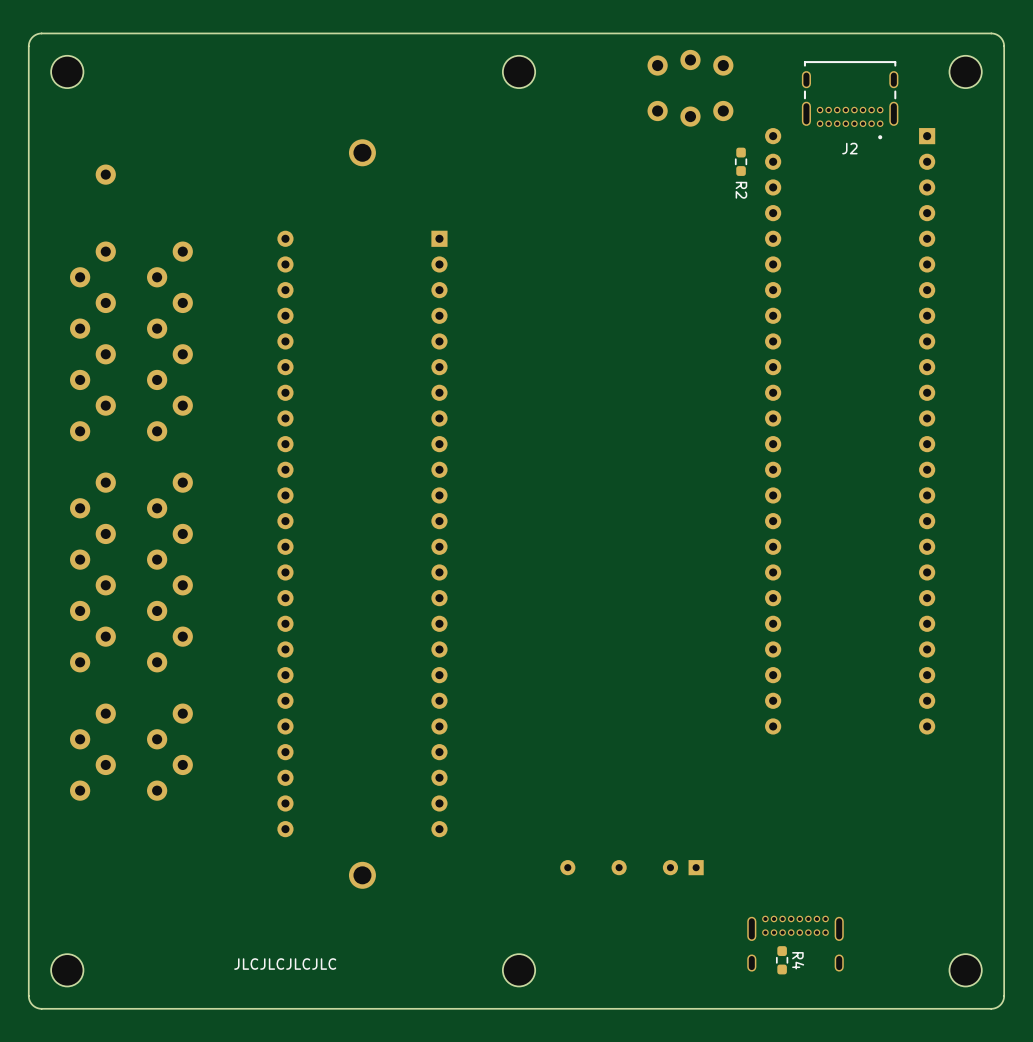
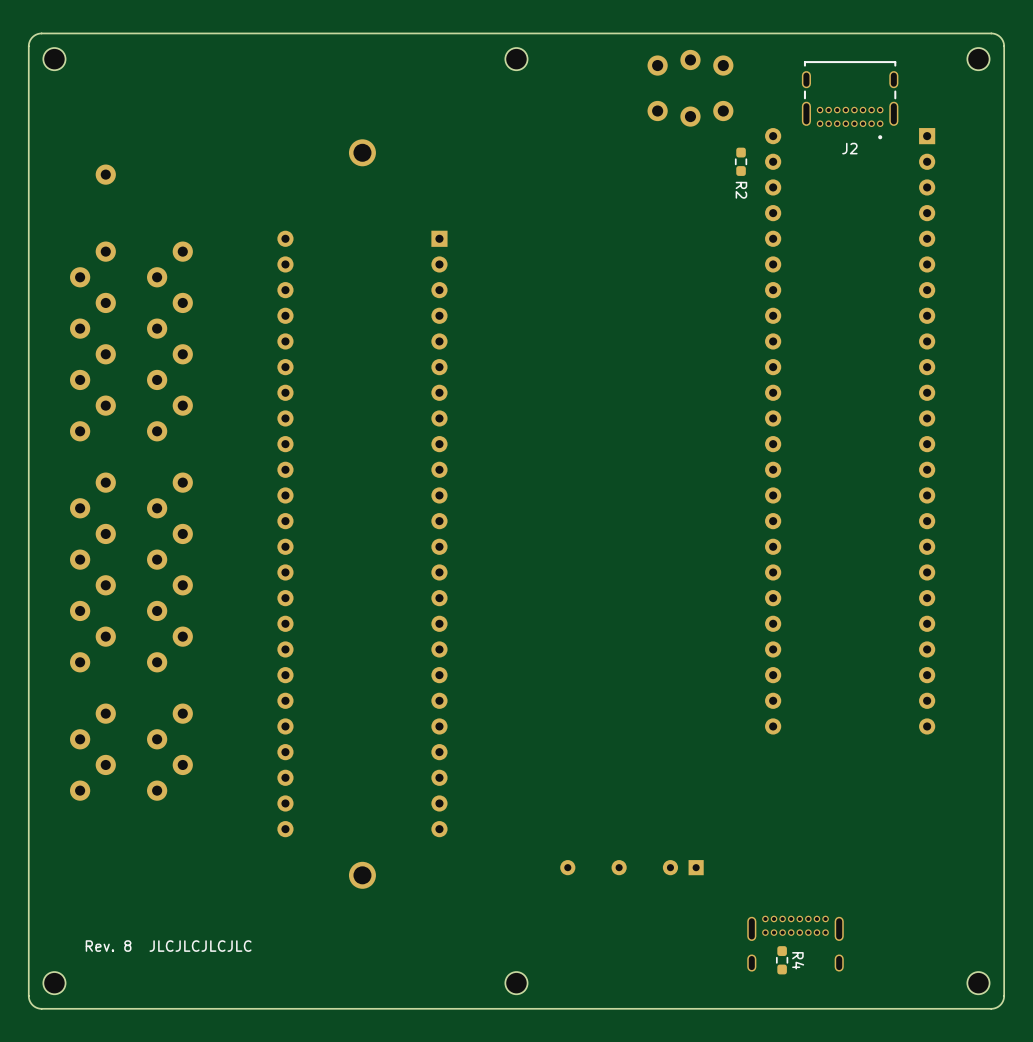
part: none -> (54, 59)
part: none -> (516, 59)
part: none -> (978, 59)
part: (67, 71) -> none
part: (519, 71) -> none
part: (965, 71) -> none
text: none -> Rev. 8 (108, 946)
text position: JLCJLCJLCJLC (285, 964) -> JLCJLCJLCJLC (200, 946)
part: (67, 970) -> none
part: (519, 970) -> none
part: (965, 970) -> none
part: none -> (54, 983)
part: none -> (516, 983)
part: none -> (978, 983)

